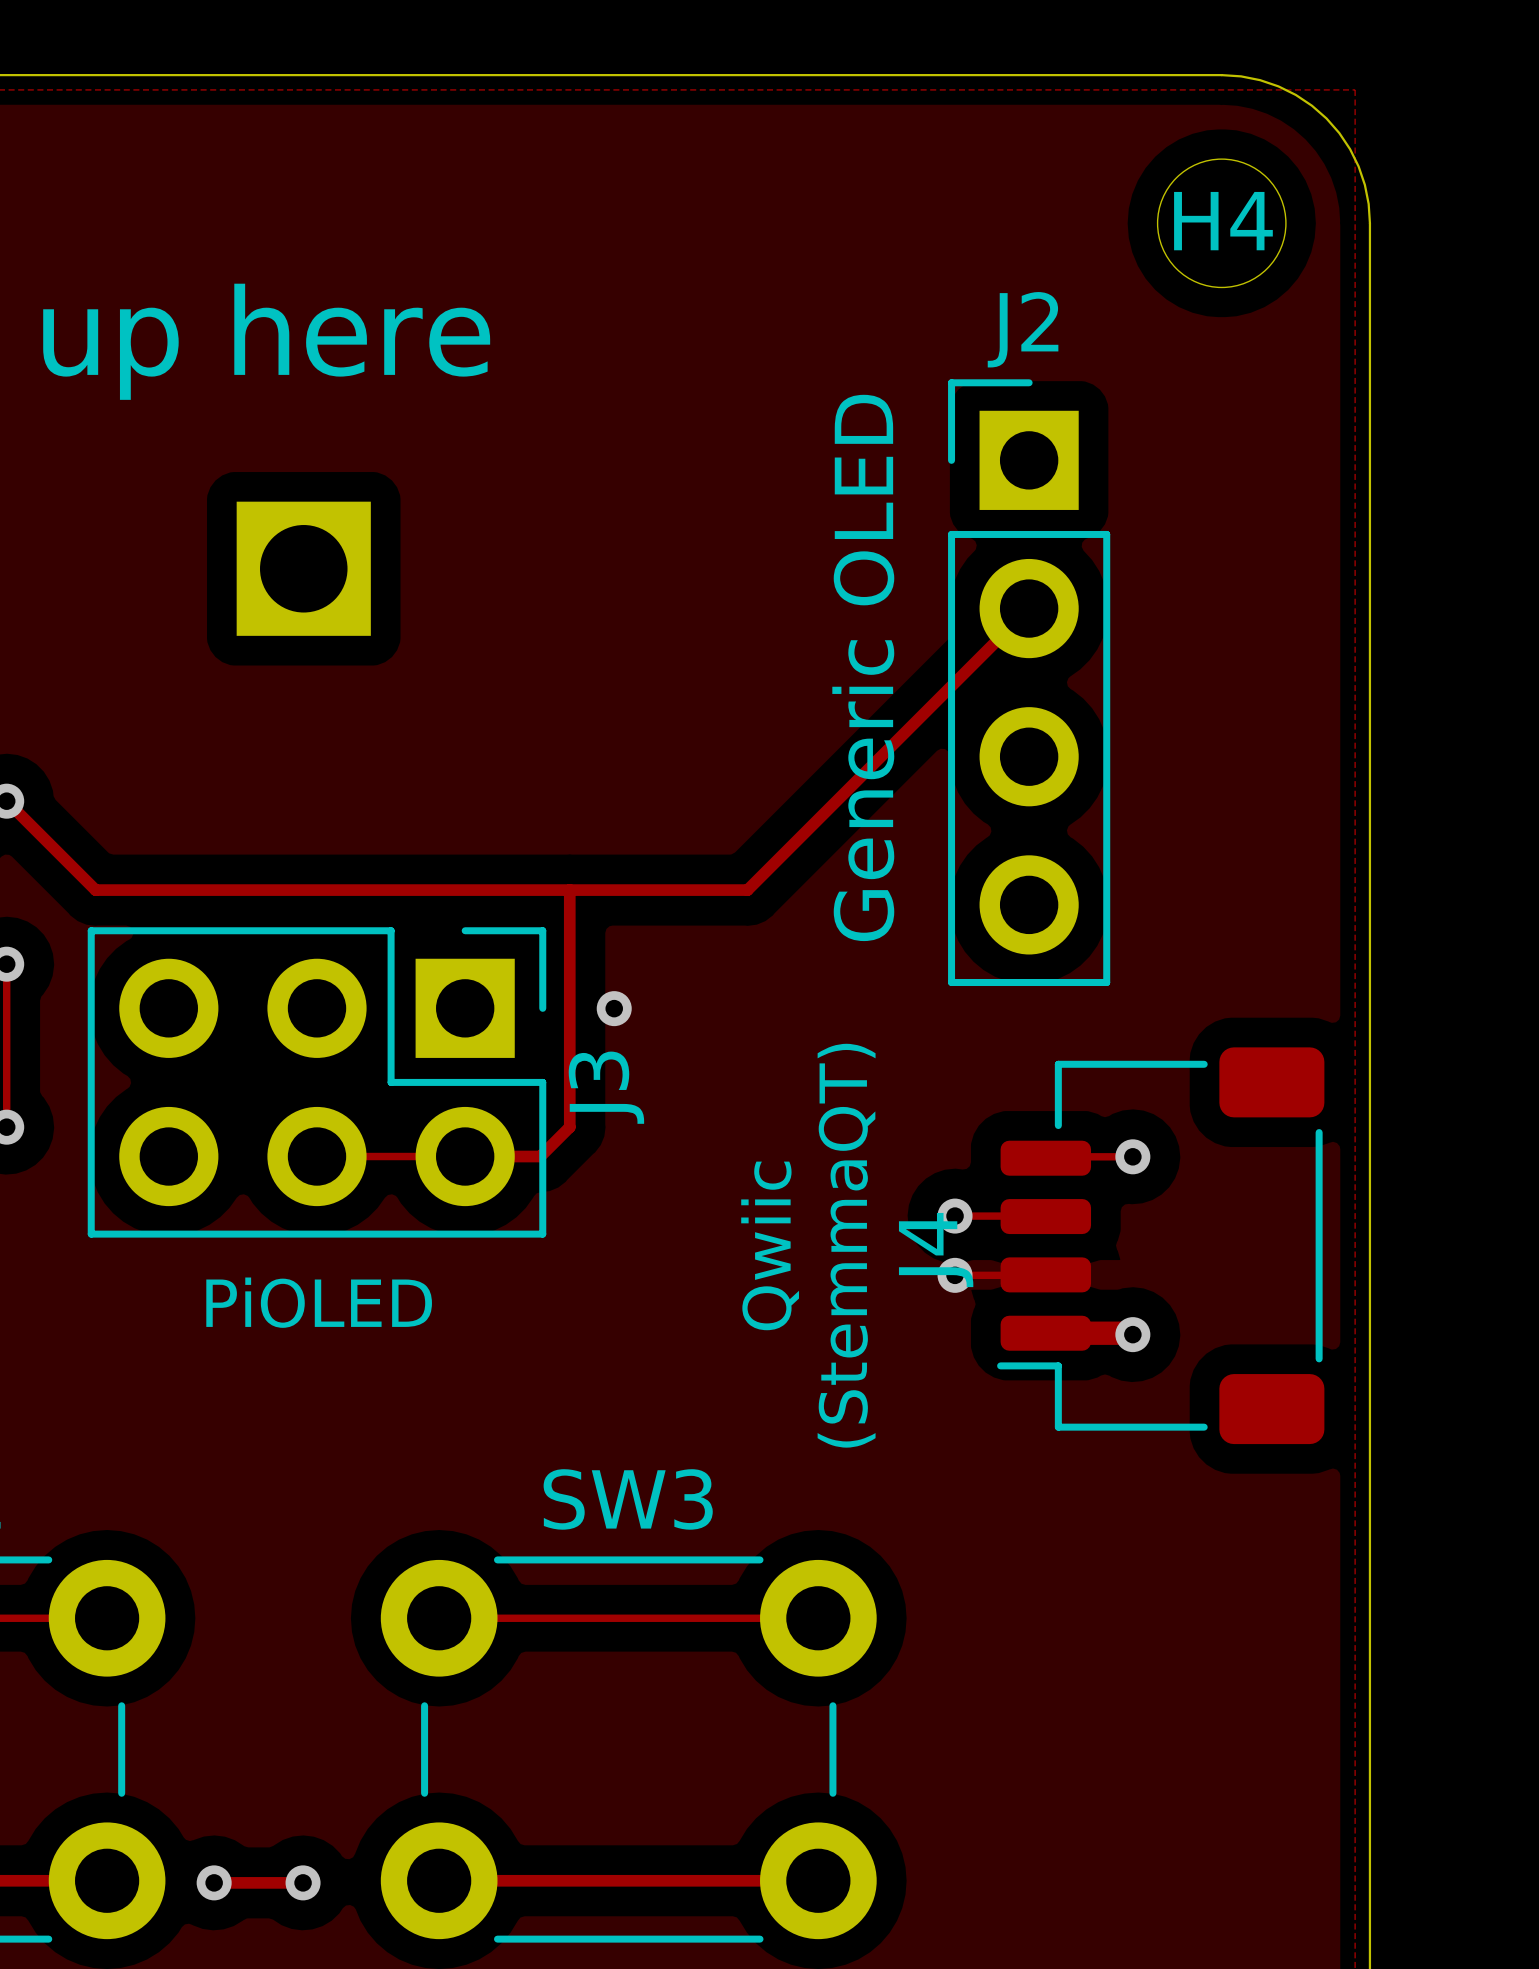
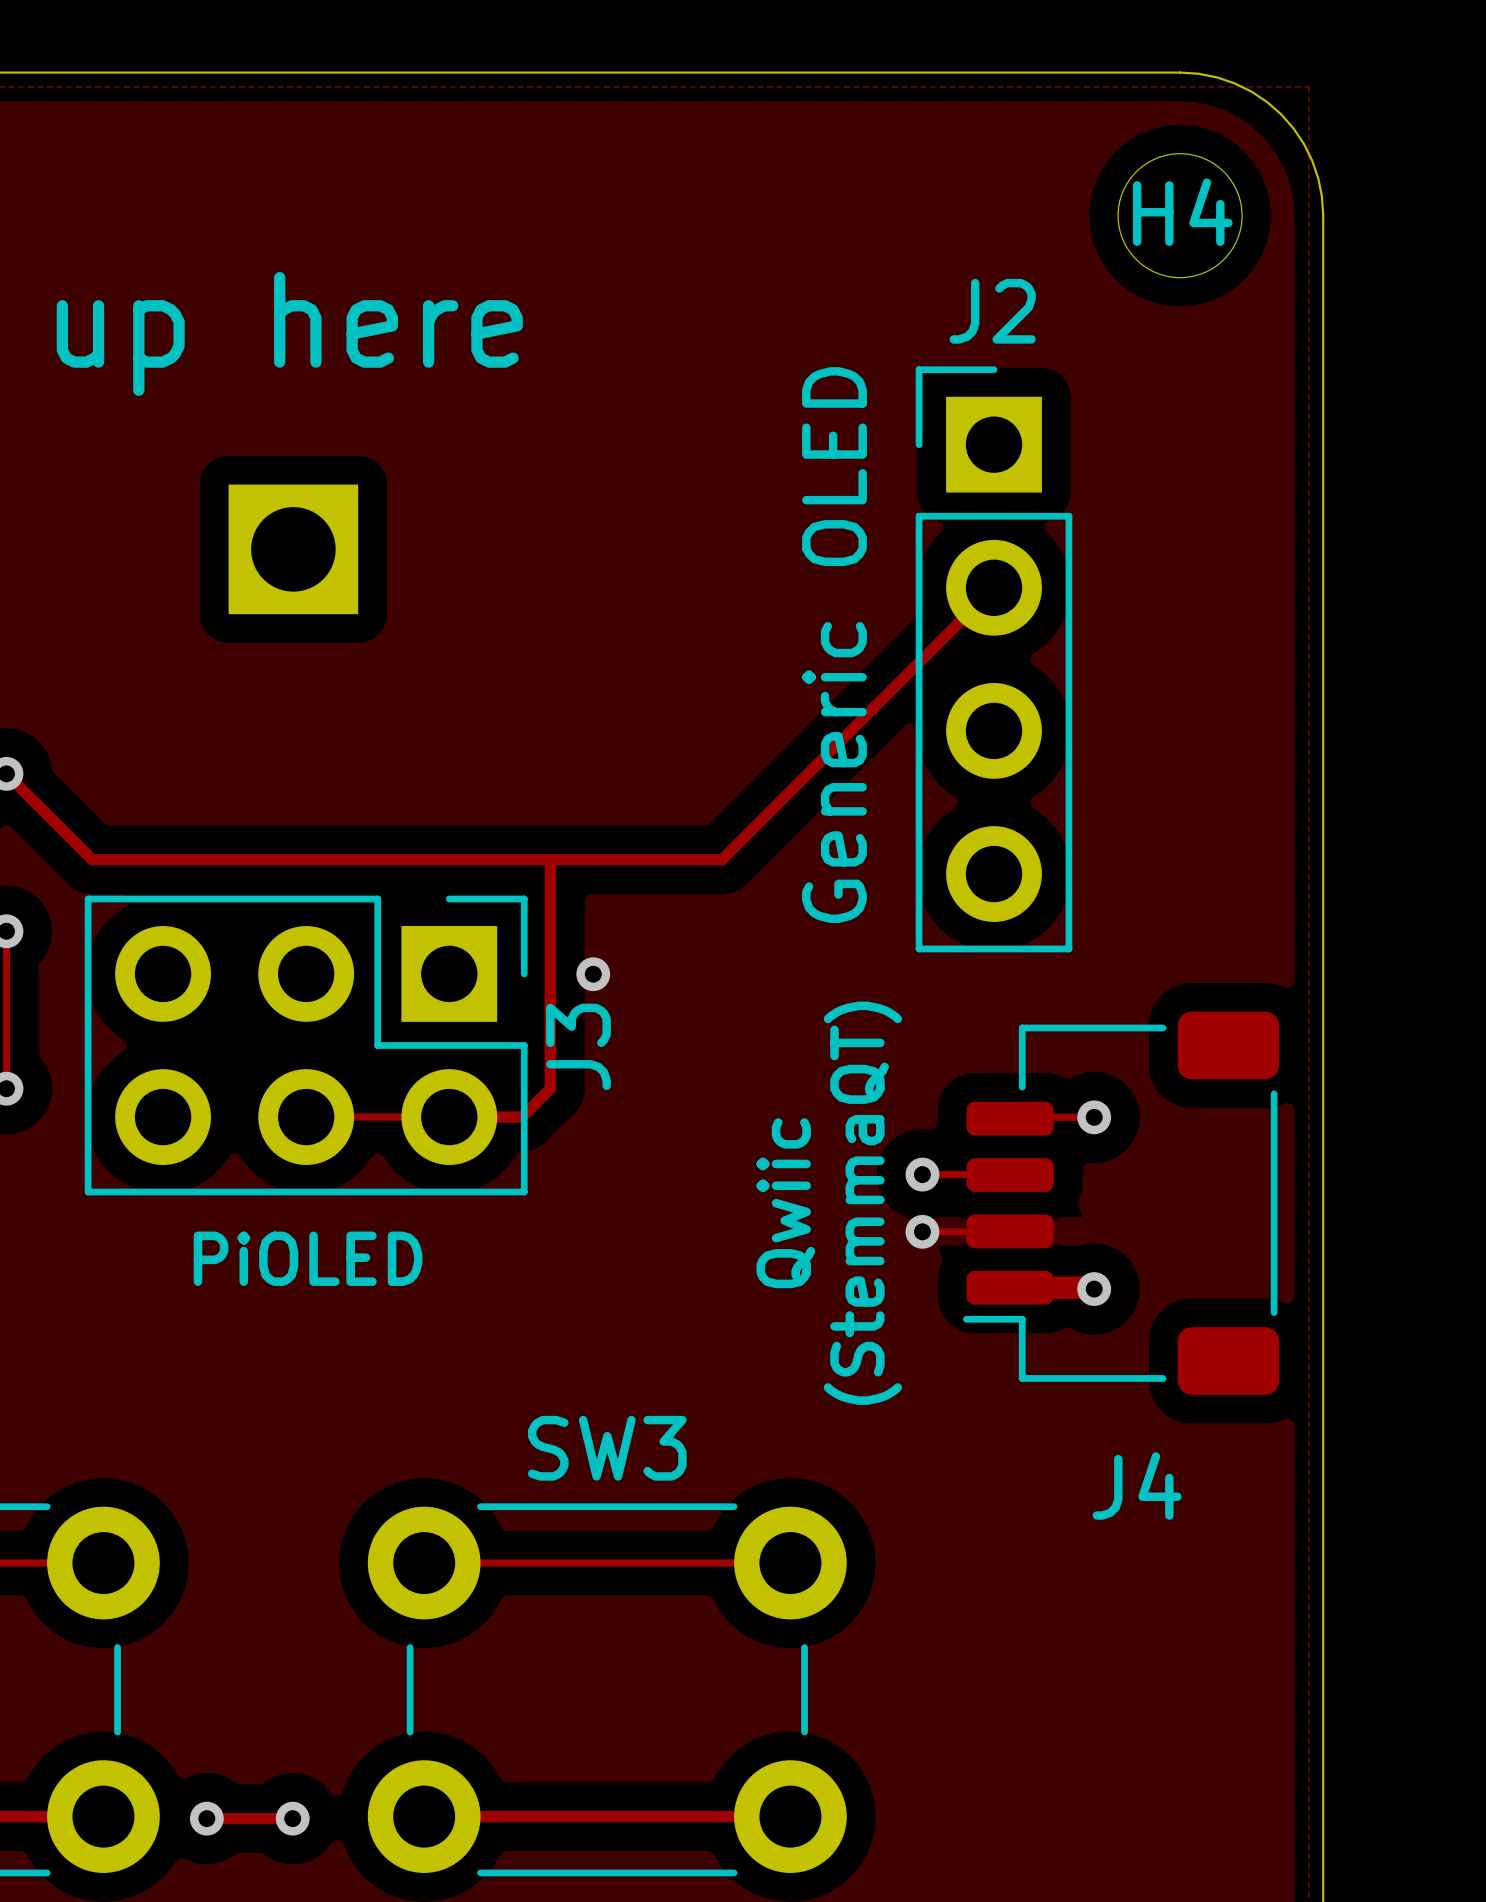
text position: Qwiic (770, 1245) -> Qwiic (785, 1203)
text position: (StemmaQT) (846, 1245) -> (StemmaQT) (862, 1203)
J4 name rotation: 0° (936, 1250) -> 90° clockwise (1137, 1486)
J4 name position: J4 (936, 1250) -> J4 (1137, 1486)

